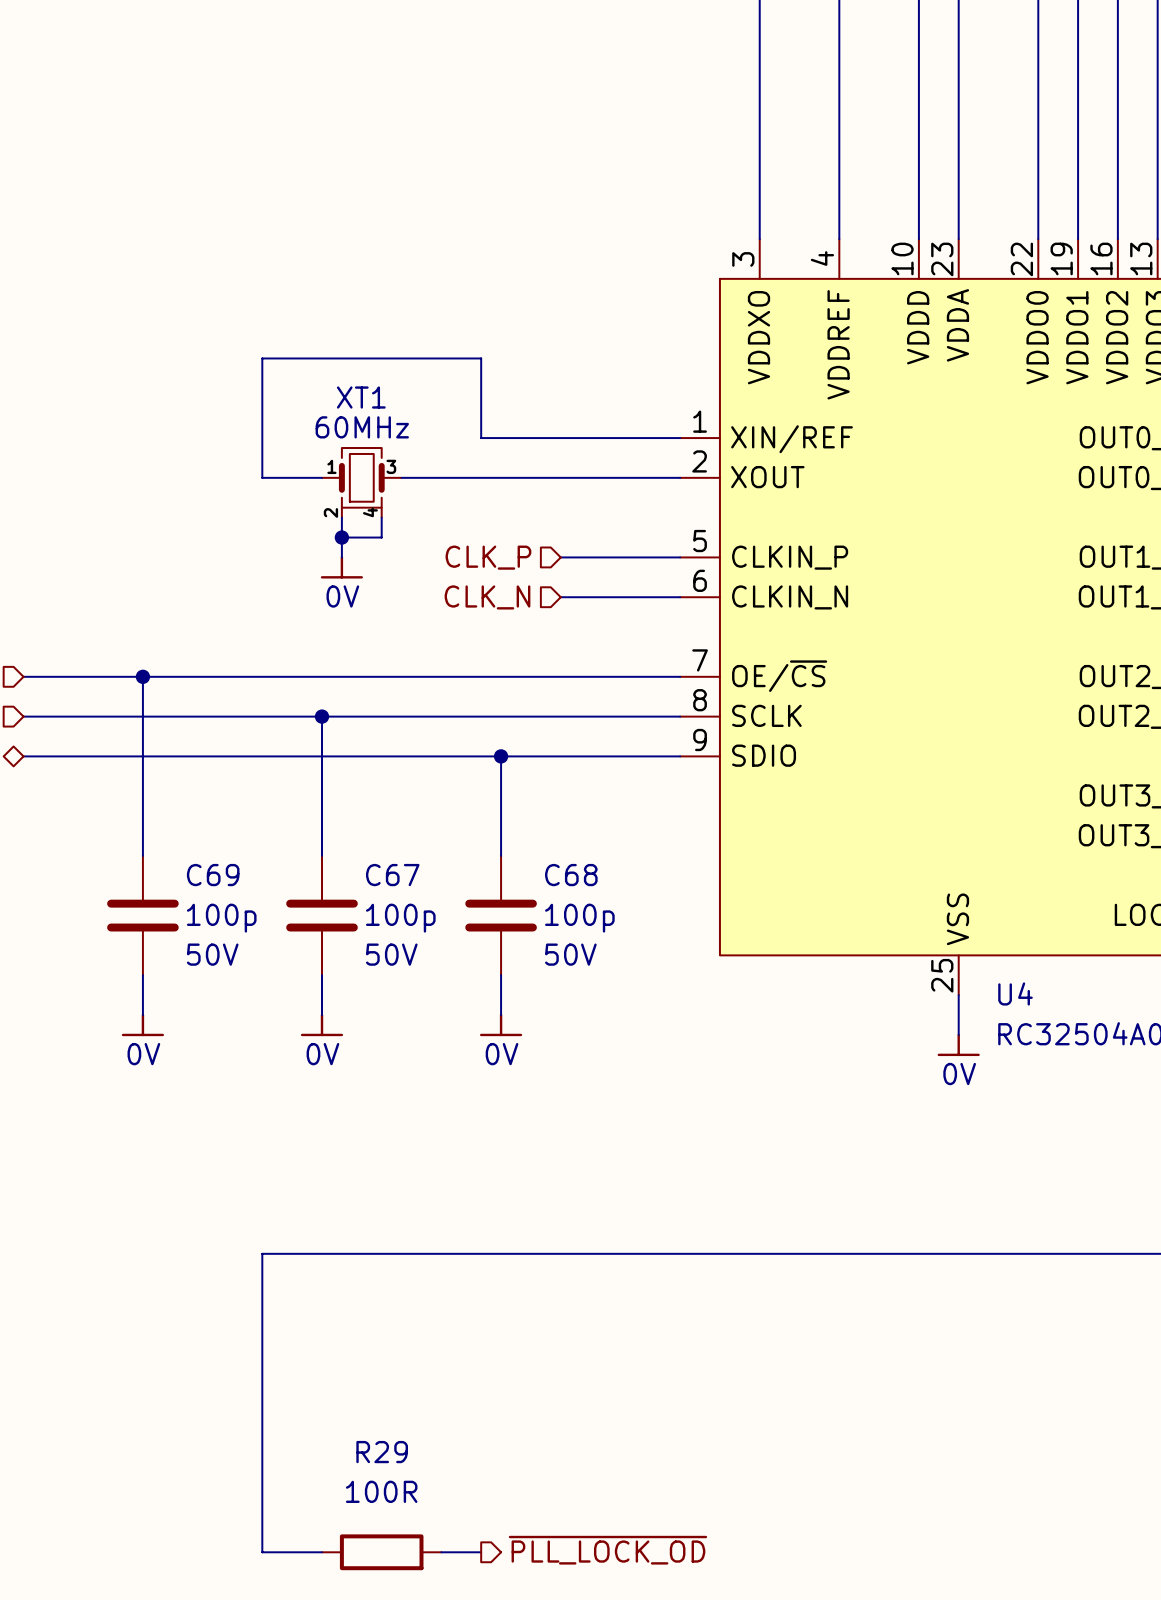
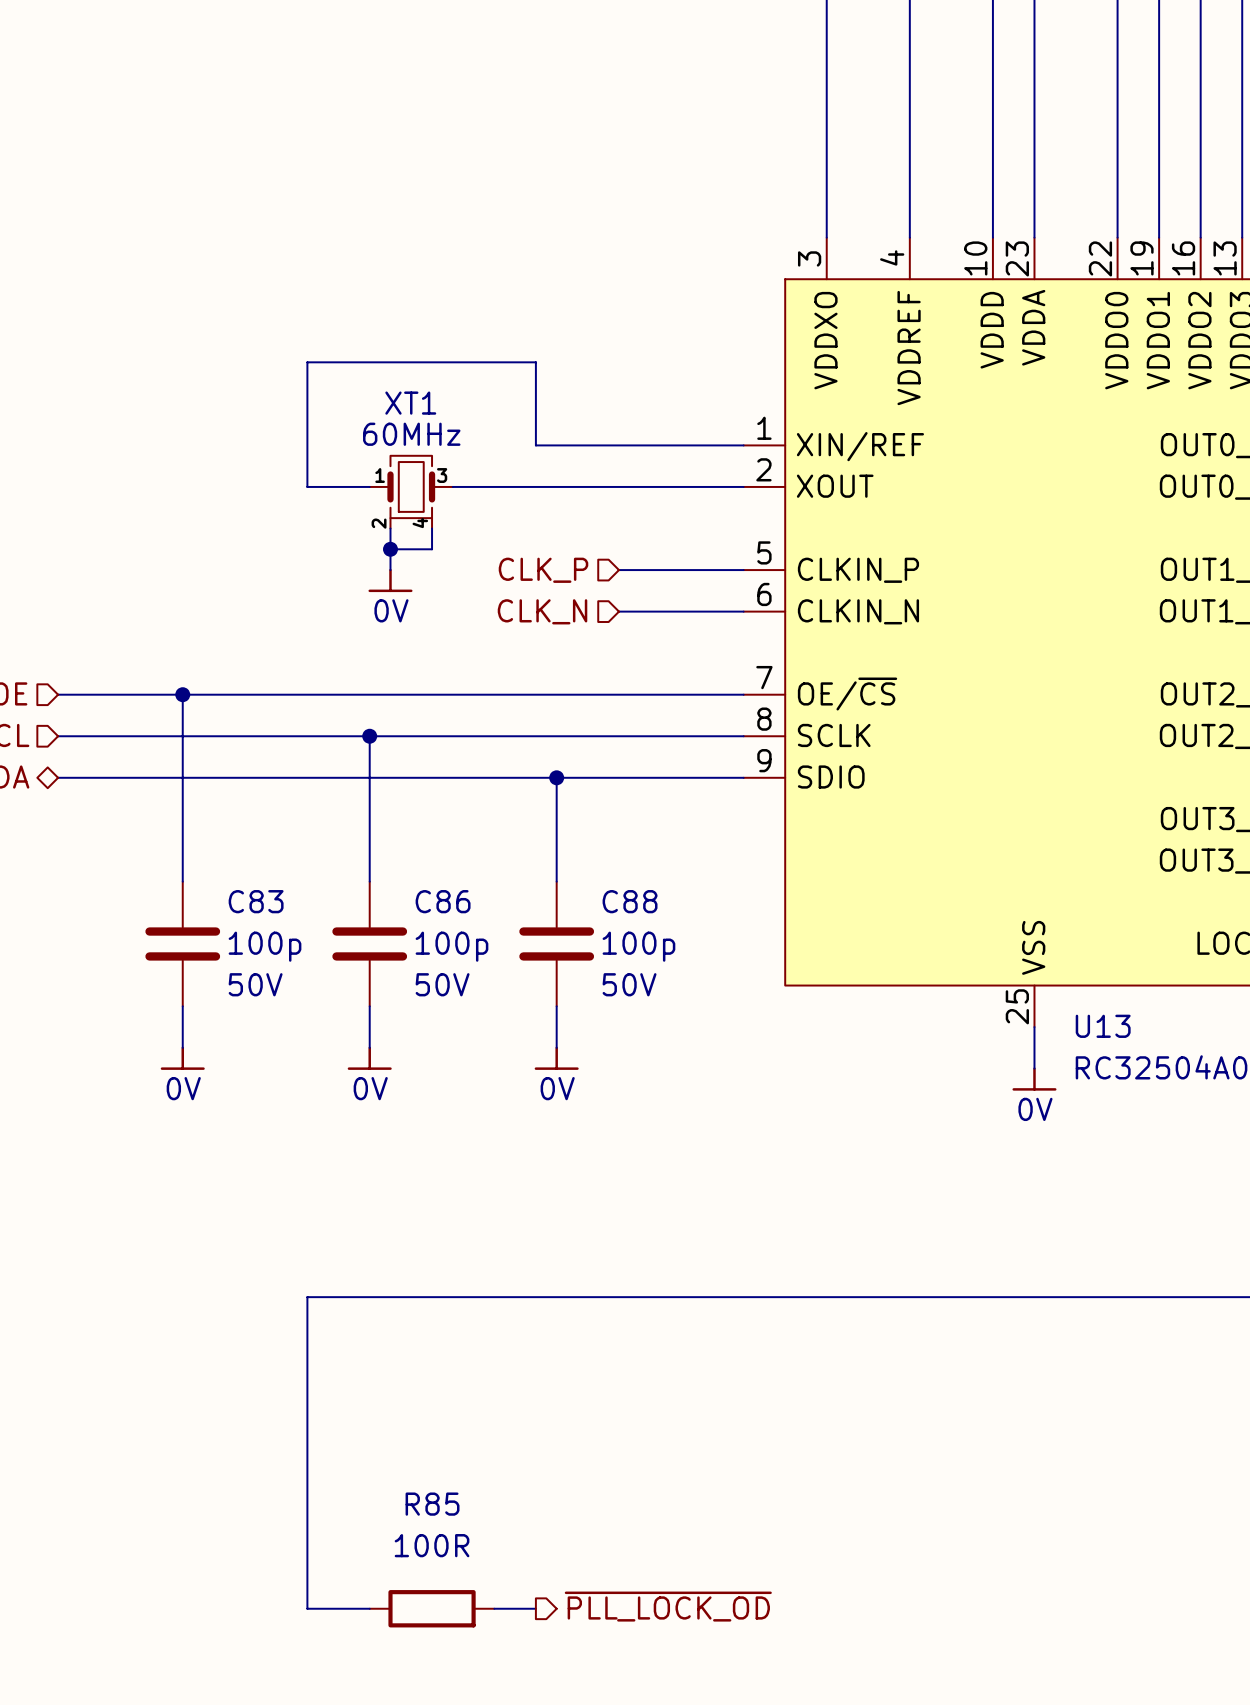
C69 name: C69 (213, 875) -> C83 (256, 901)
C67 name: C67 (392, 875) -> C86 (443, 901)
C68 name: C68 (571, 875) -> C88 (630, 901)
U4 name: U4 (1015, 993) -> U13 (1103, 1026)
R29 name: R29 (382, 1452) -> R85 (432, 1504)

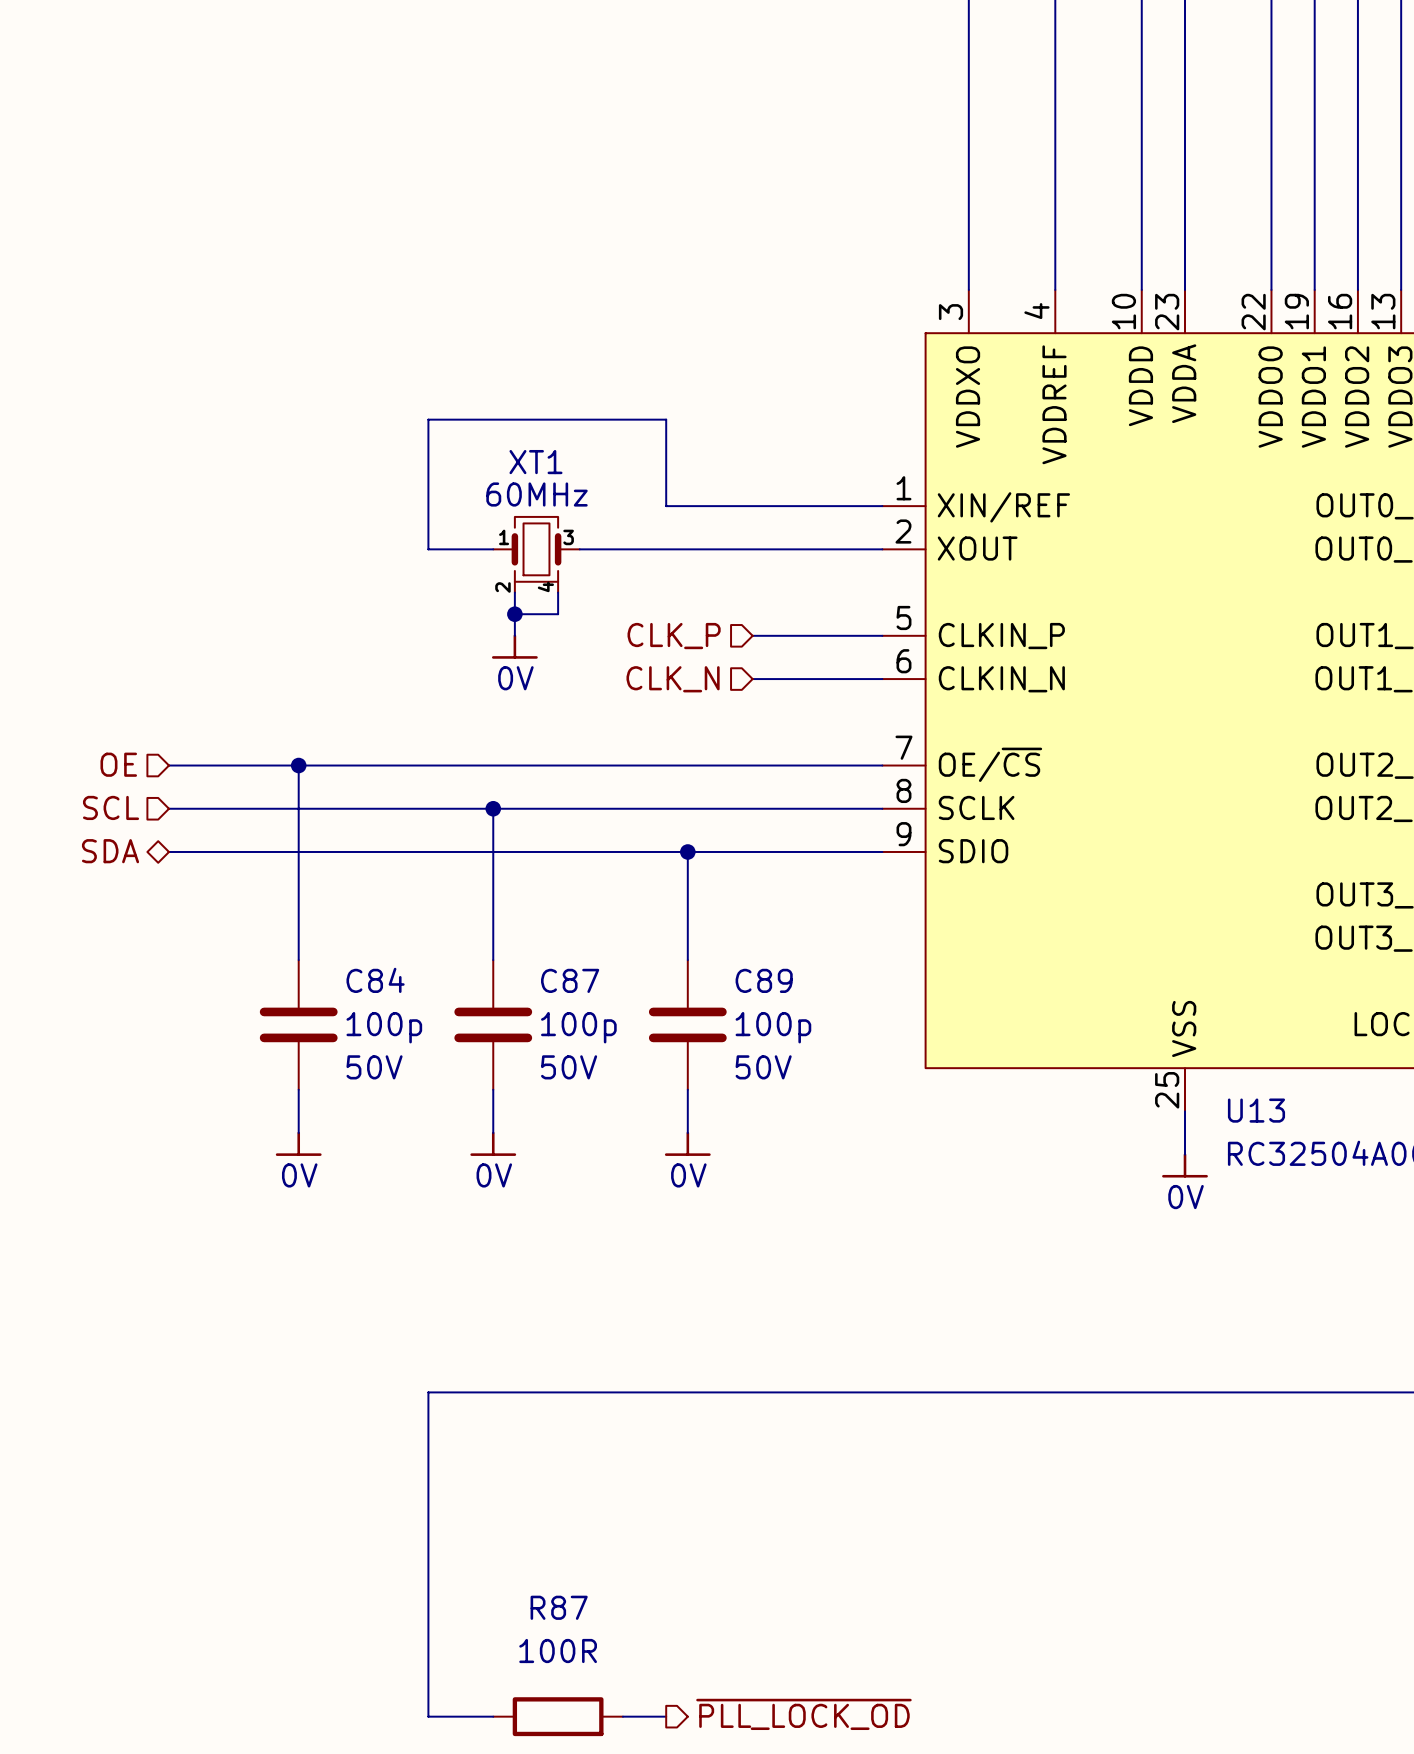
C83 name: C83 (256, 901) -> C84 (375, 980)
C86 name: C86 (443, 901) -> C87 (570, 980)
C88 name: C88 (630, 901) -> C89 (764, 980)
R85 name: R85 (432, 1504) -> R87 (559, 1607)

